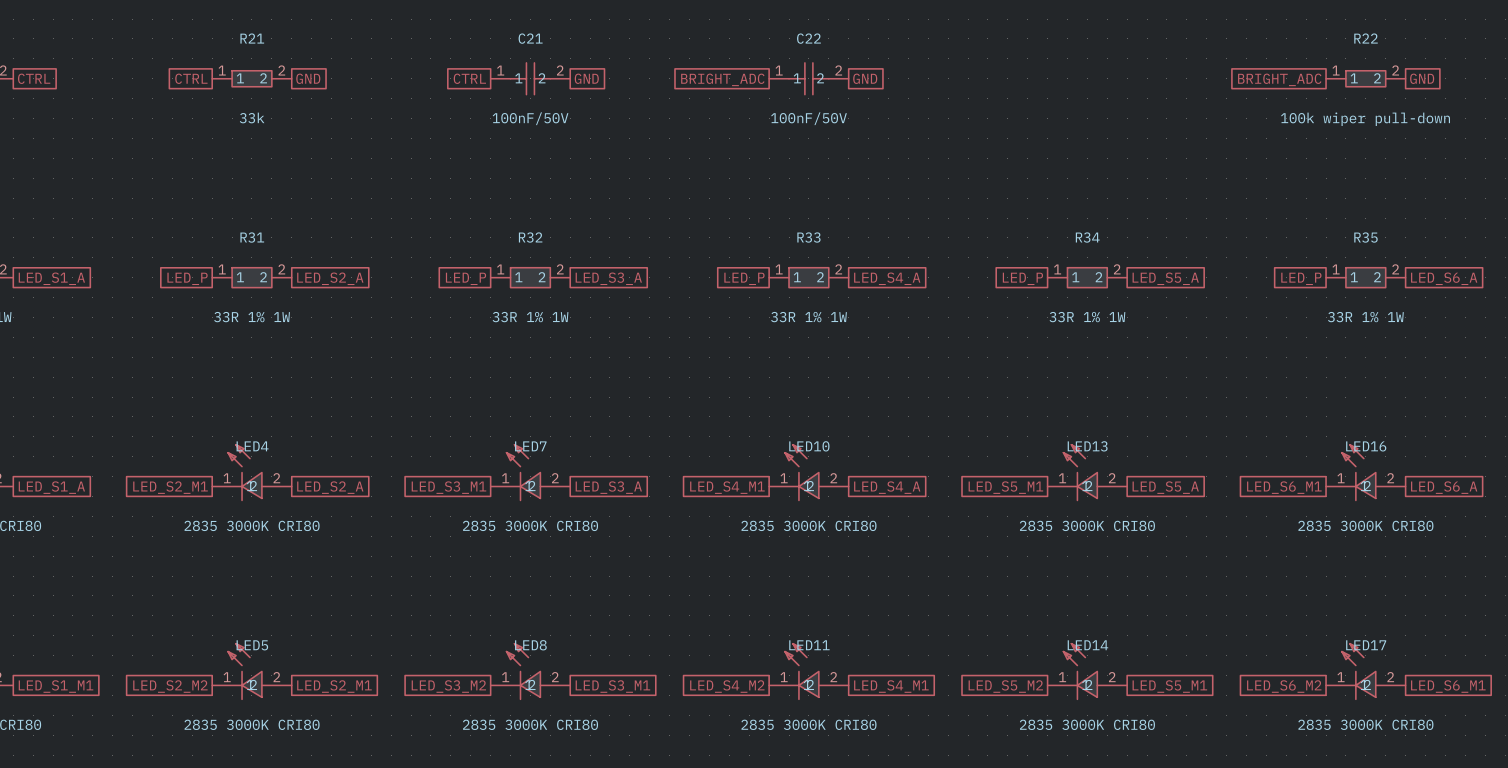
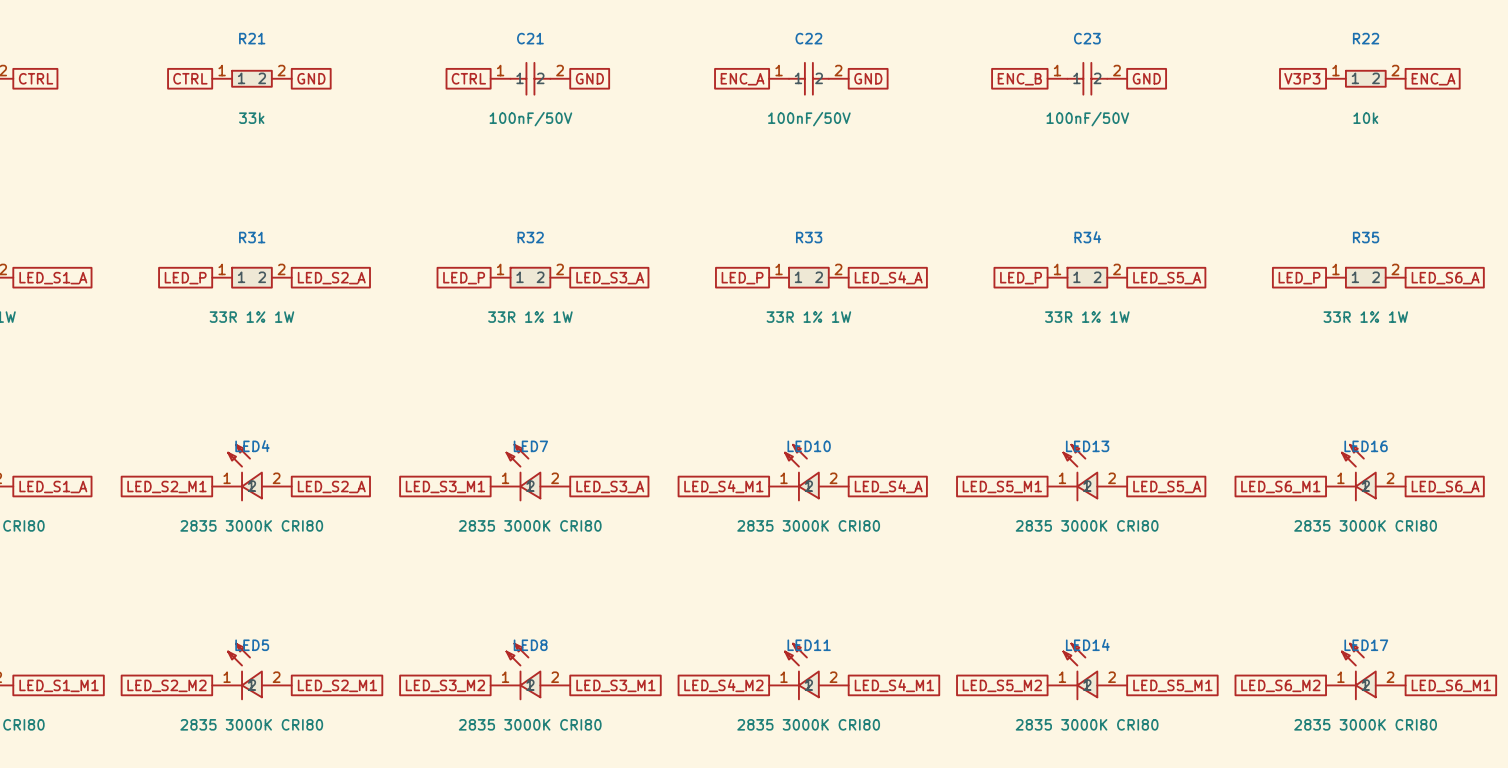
C23: none -> 100nF/50V (1087, 78)
global label: none -> GND (1146, 78)
global label: GND (1422, 78) -> ENC_A (1433, 79)
global label: BRIGHT_ADC (722, 79) -> ENC_A (742, 79)
global label: none -> ENC_B (1019, 79)
global label: BRIGHT_ADC (1279, 79) -> V3P3 (1302, 78)
R22 value: 100k wiper pull-down (1365, 119) -> 10k (1365, 118)

